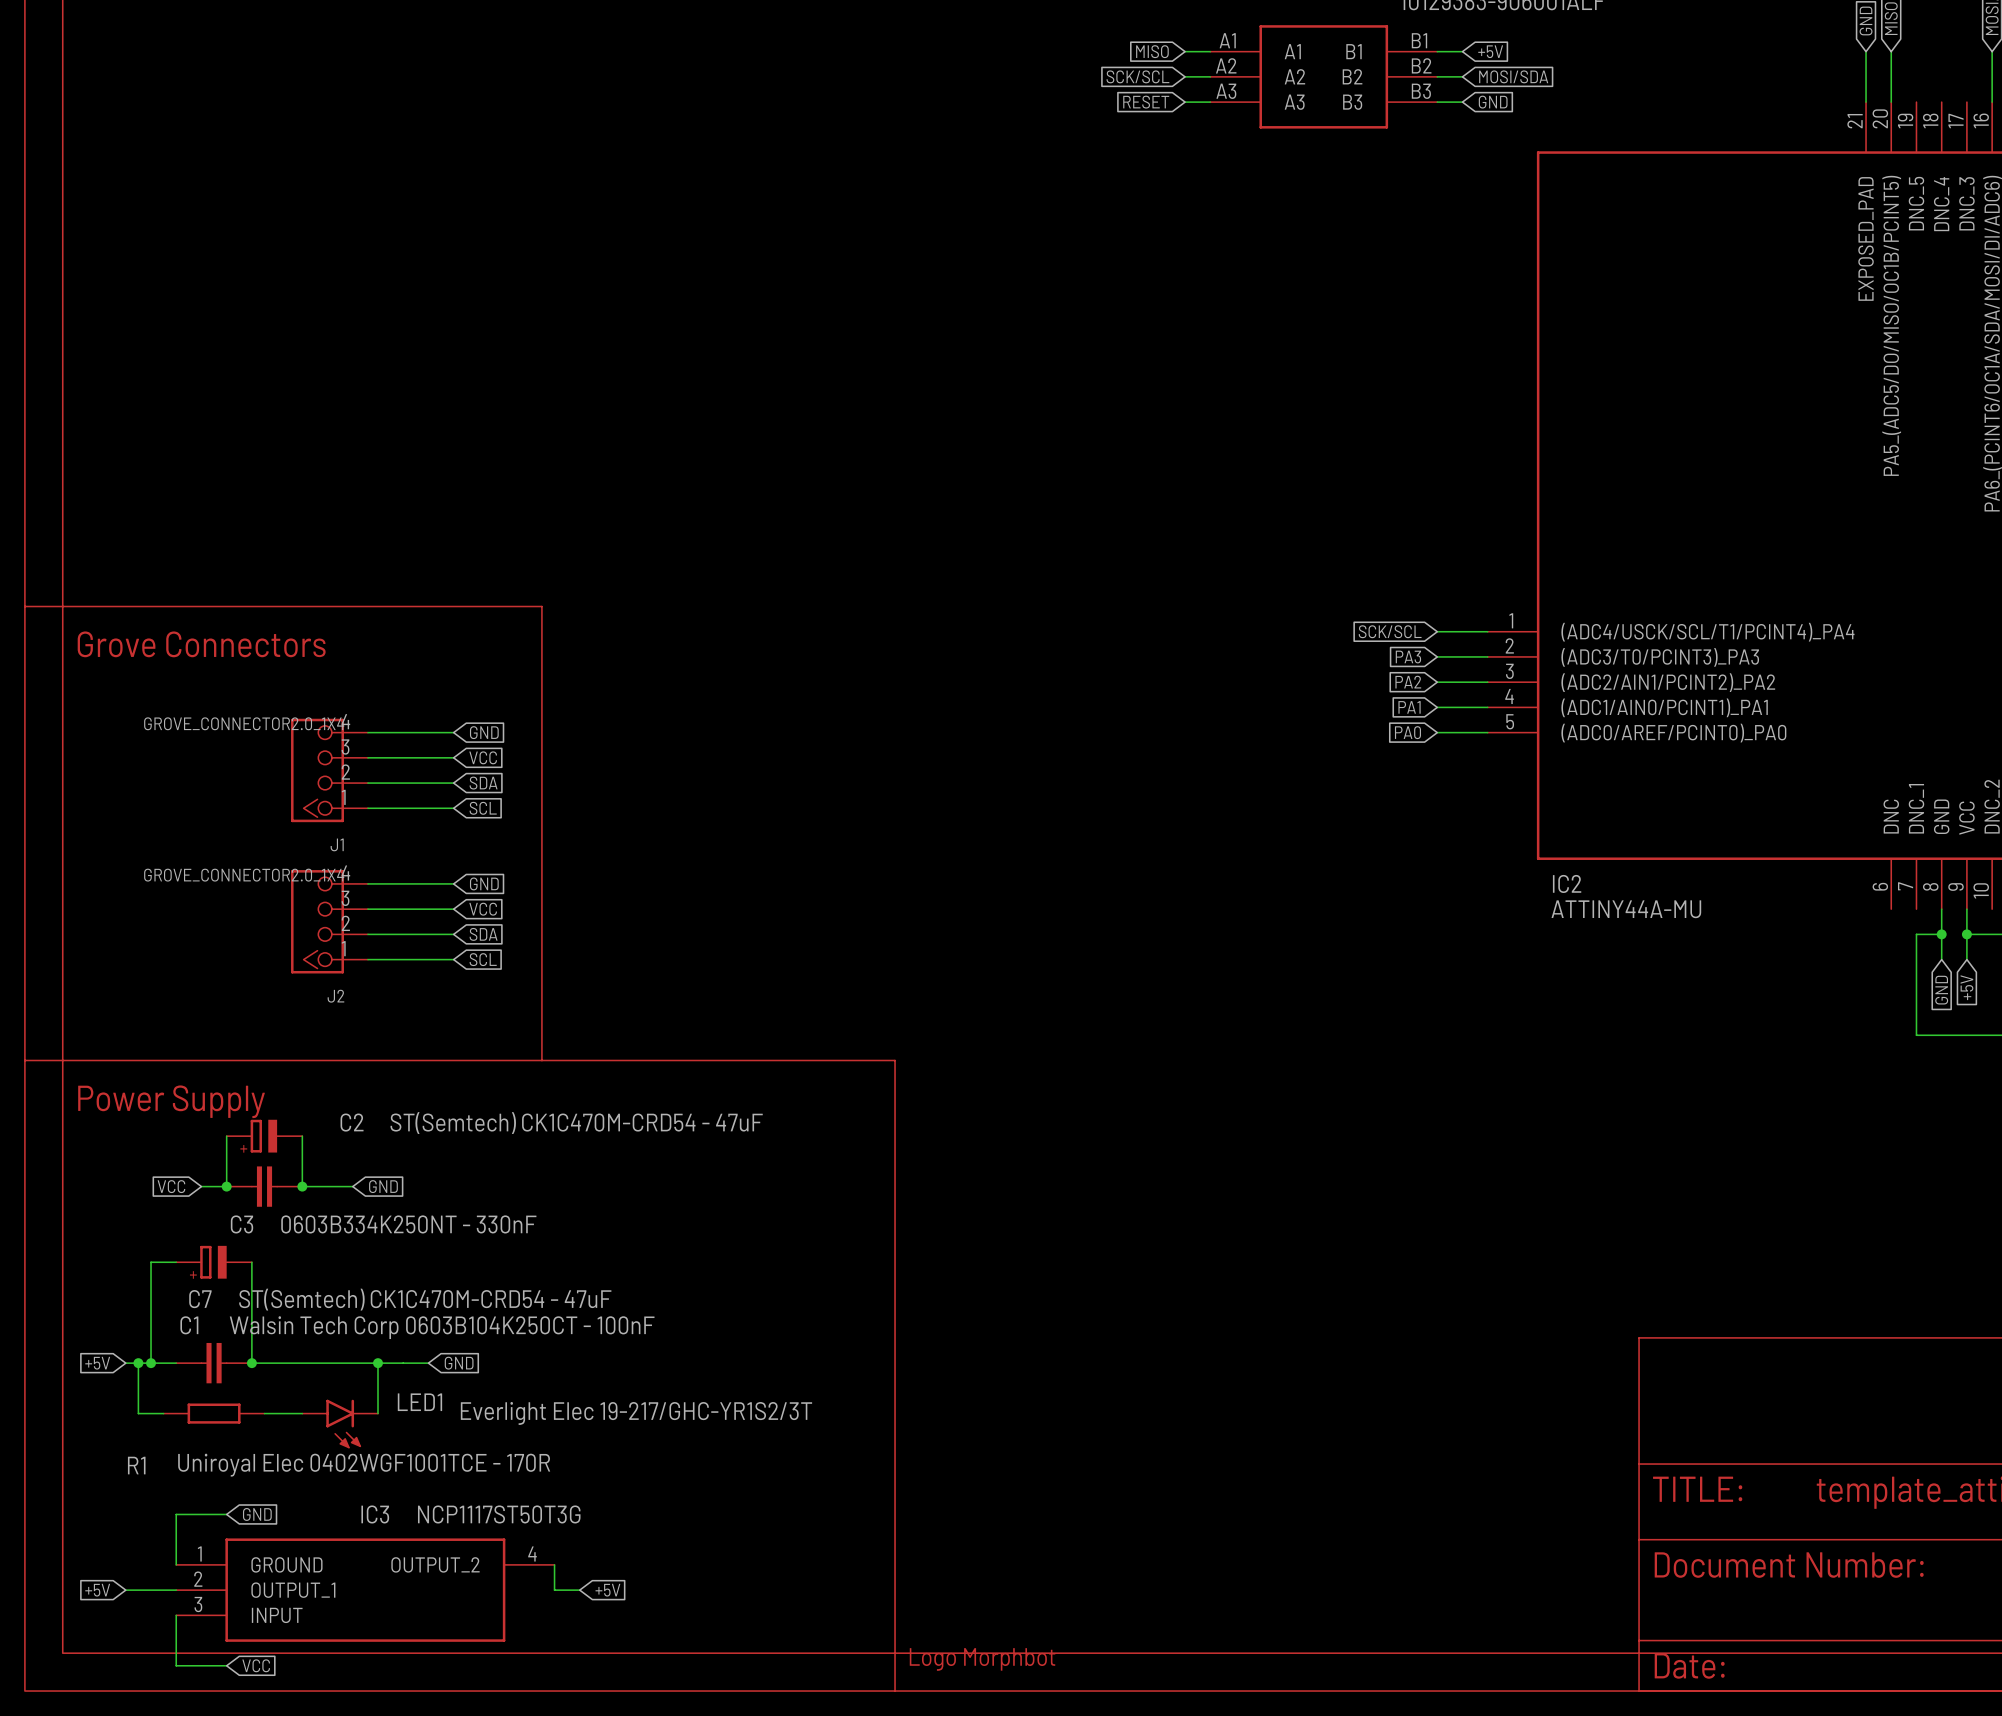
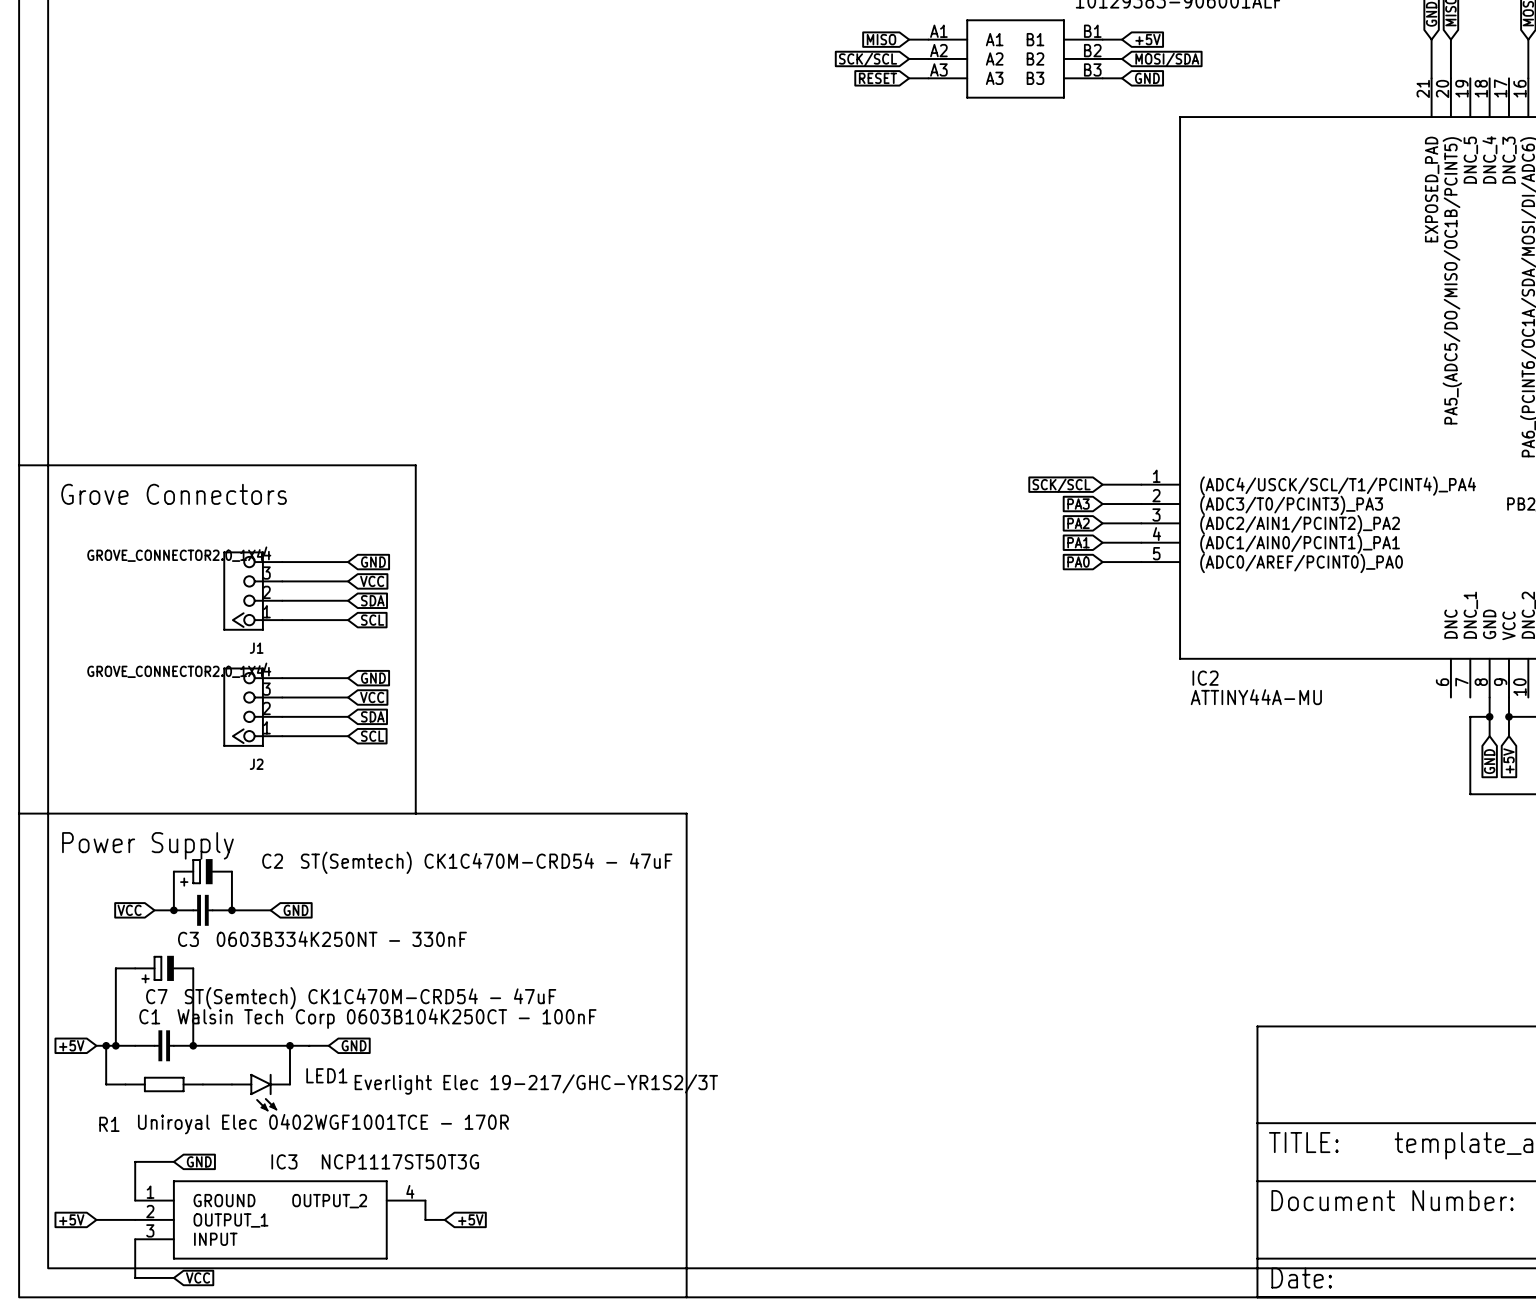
part: (982, 1659) -> none

